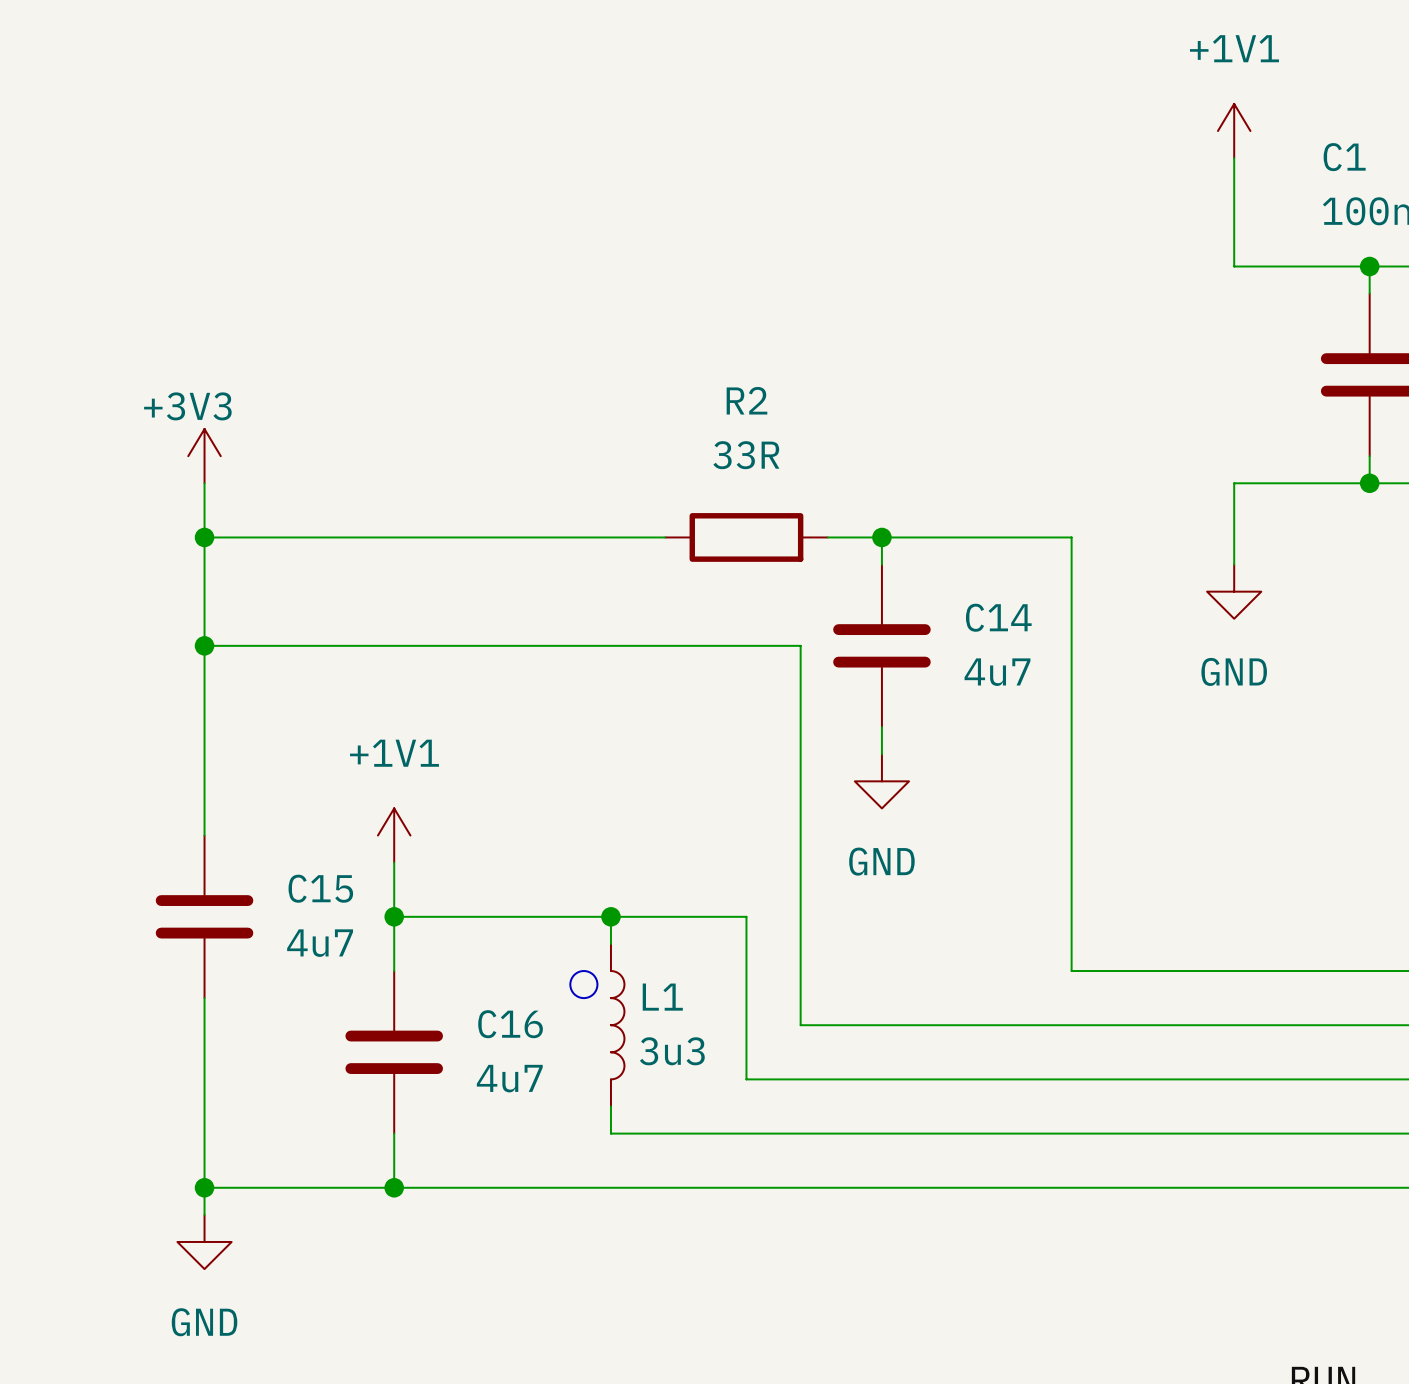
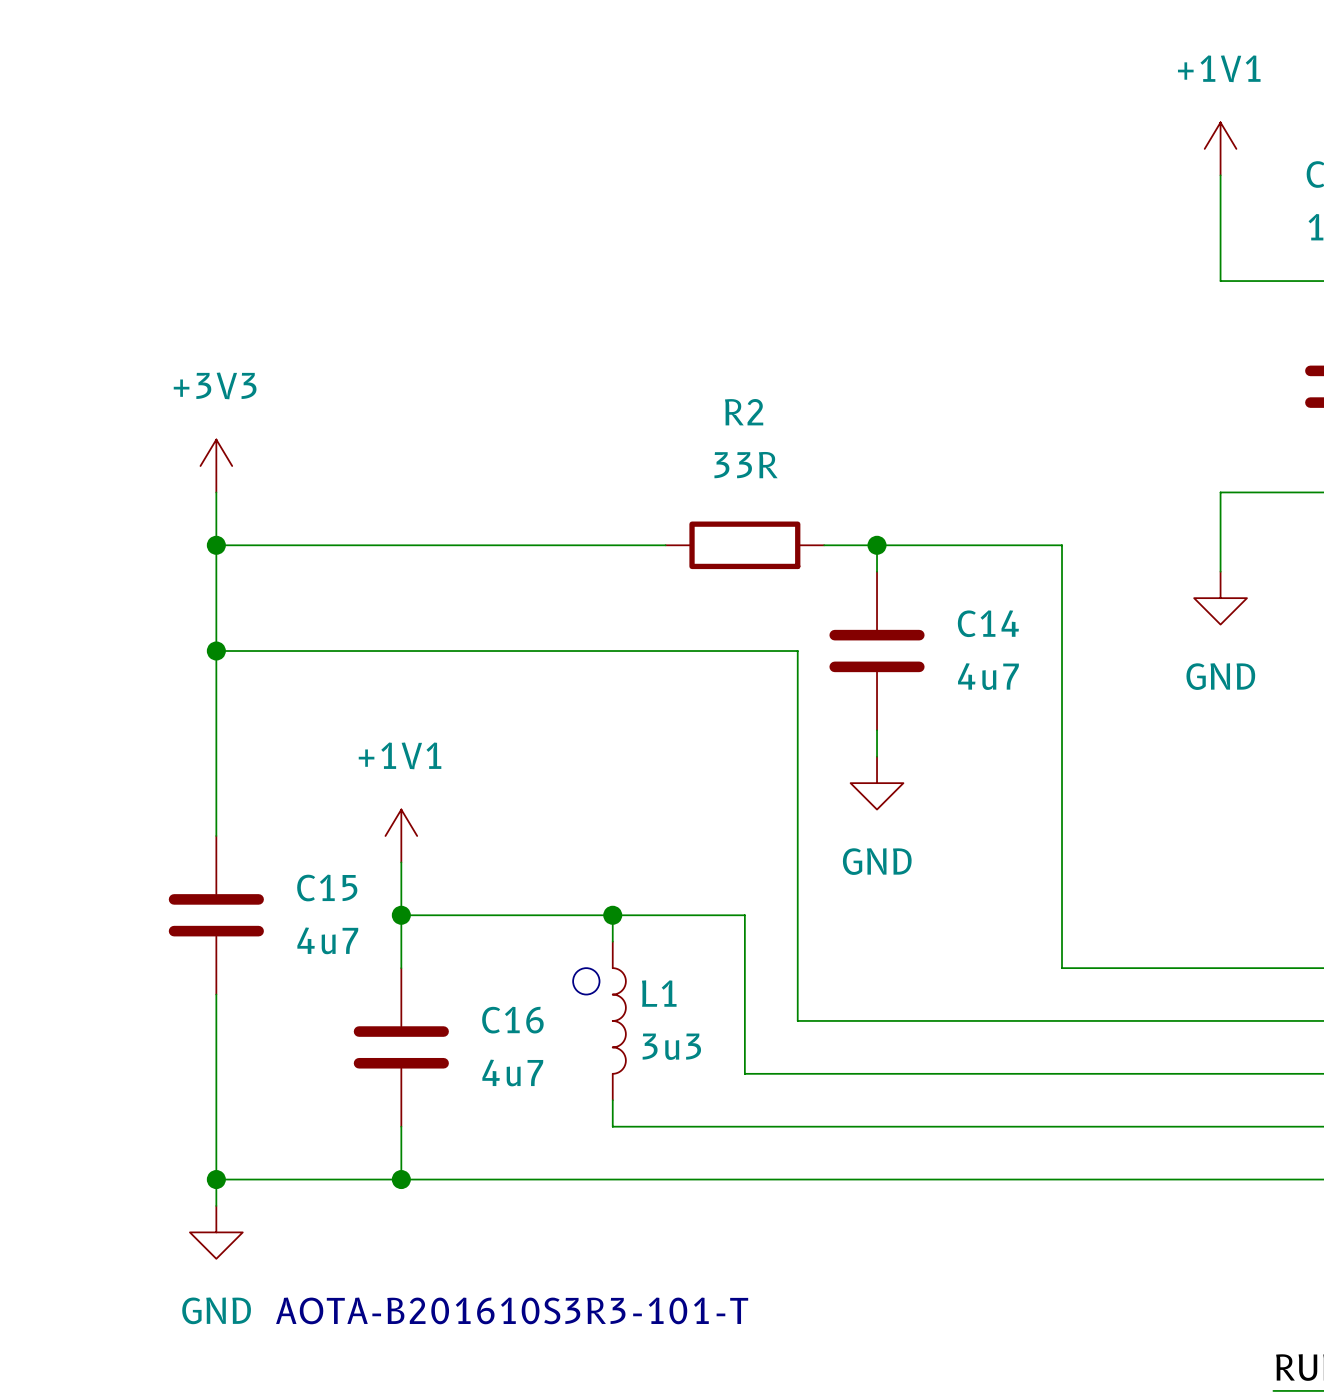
power symbol text position: +3V3 (187, 406) -> +3V3 (215, 385)
text: none -> AOTA-B201610S3R3-101-T (512, 1310)

